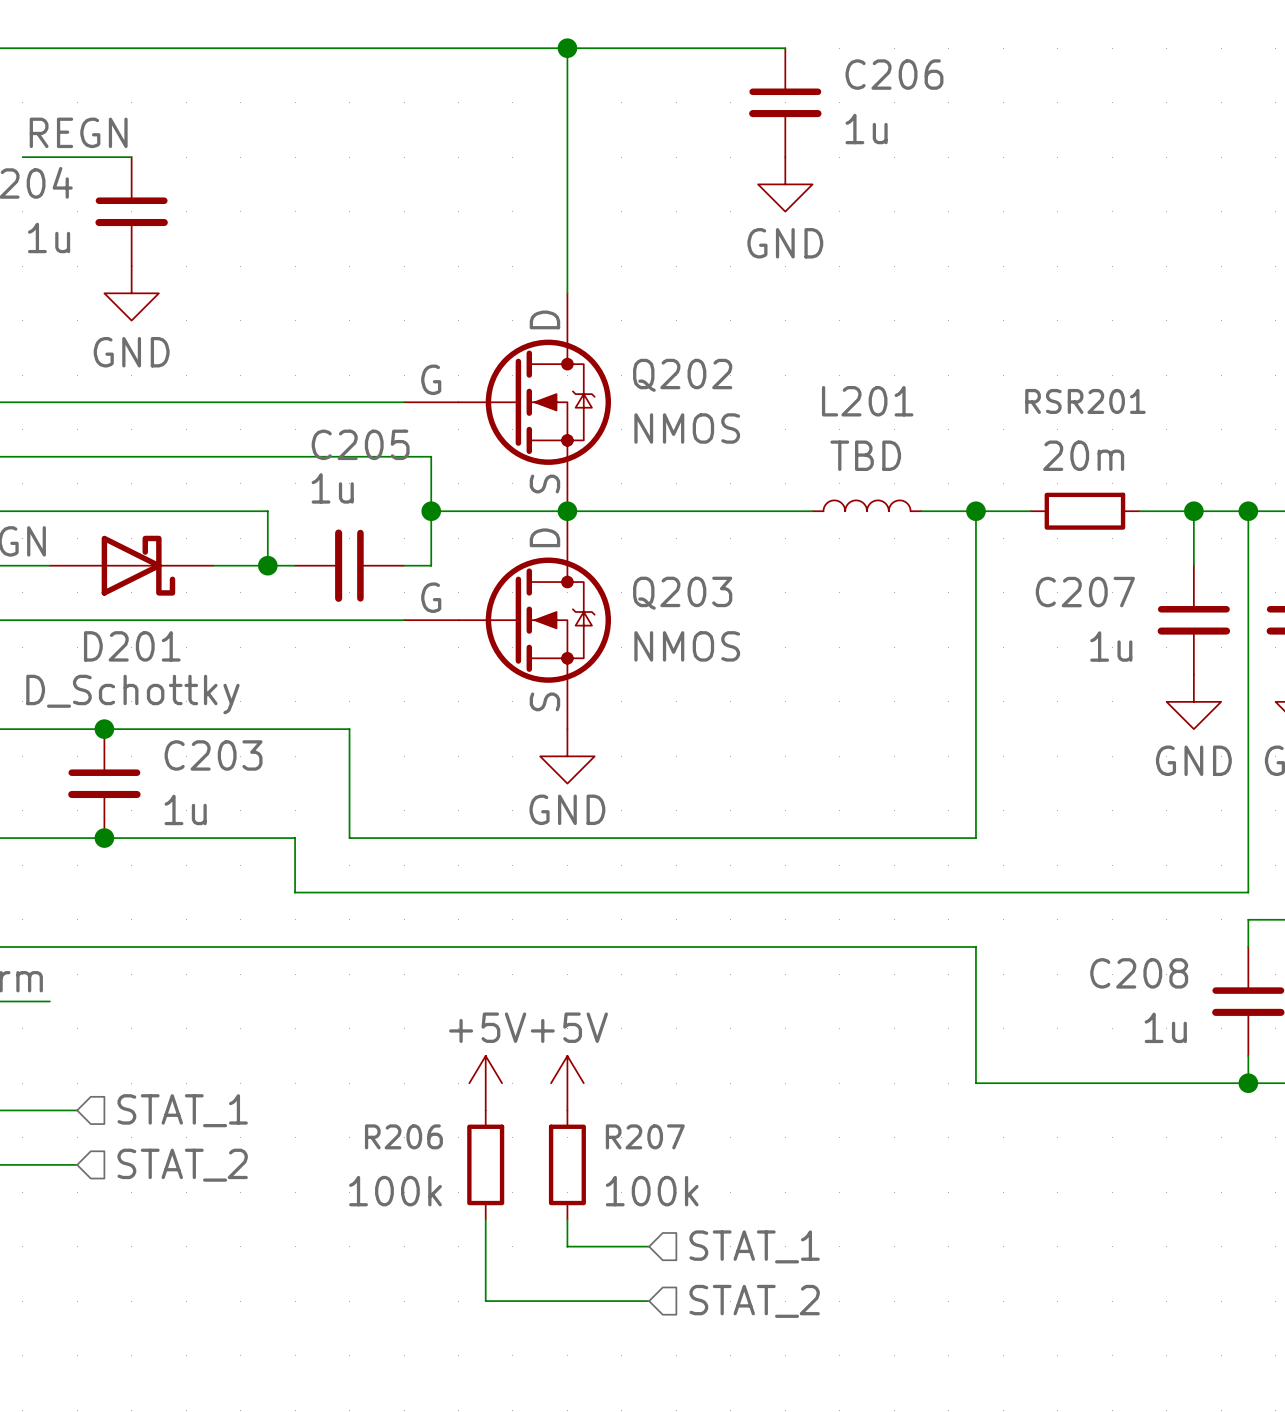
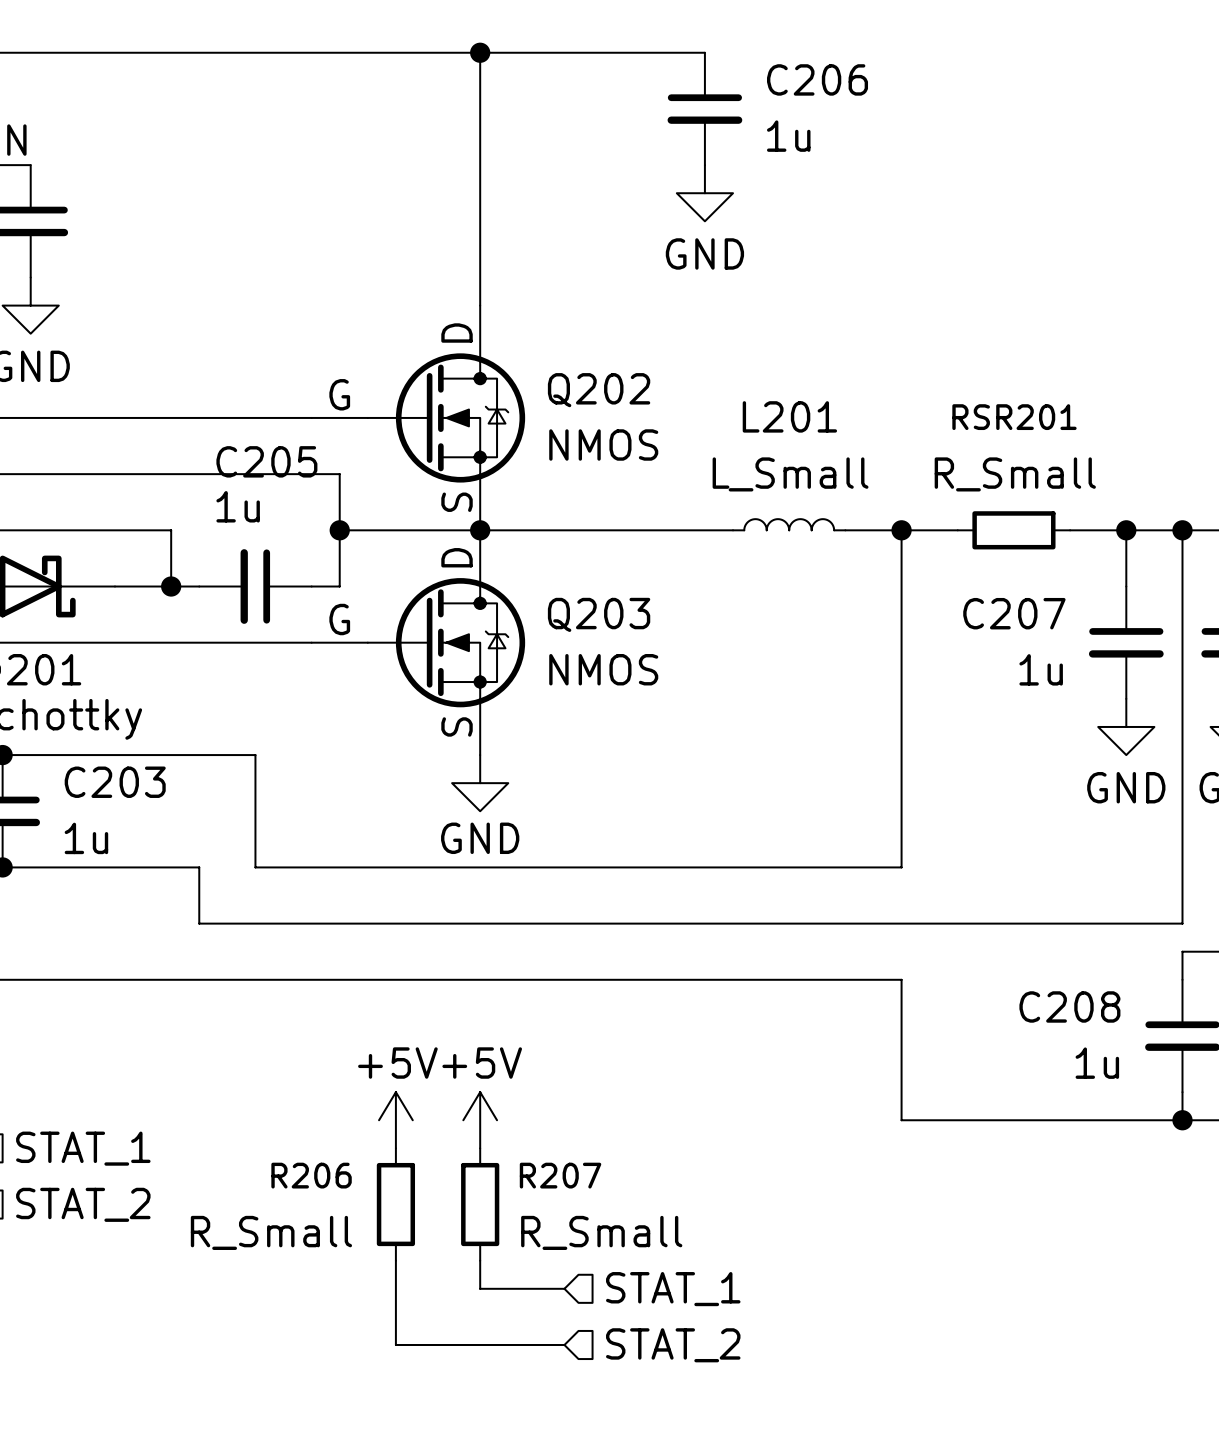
L201 value: TBD (865, 455) -> L_Small (790, 474)
RSR201 value: 20m (1083, 455) -> R_Small (1015, 474)
R206 value: 100k (395, 1191) -> R_Small (271, 1232)
R207 value: 100k (652, 1191) -> R_Small (601, 1232)

